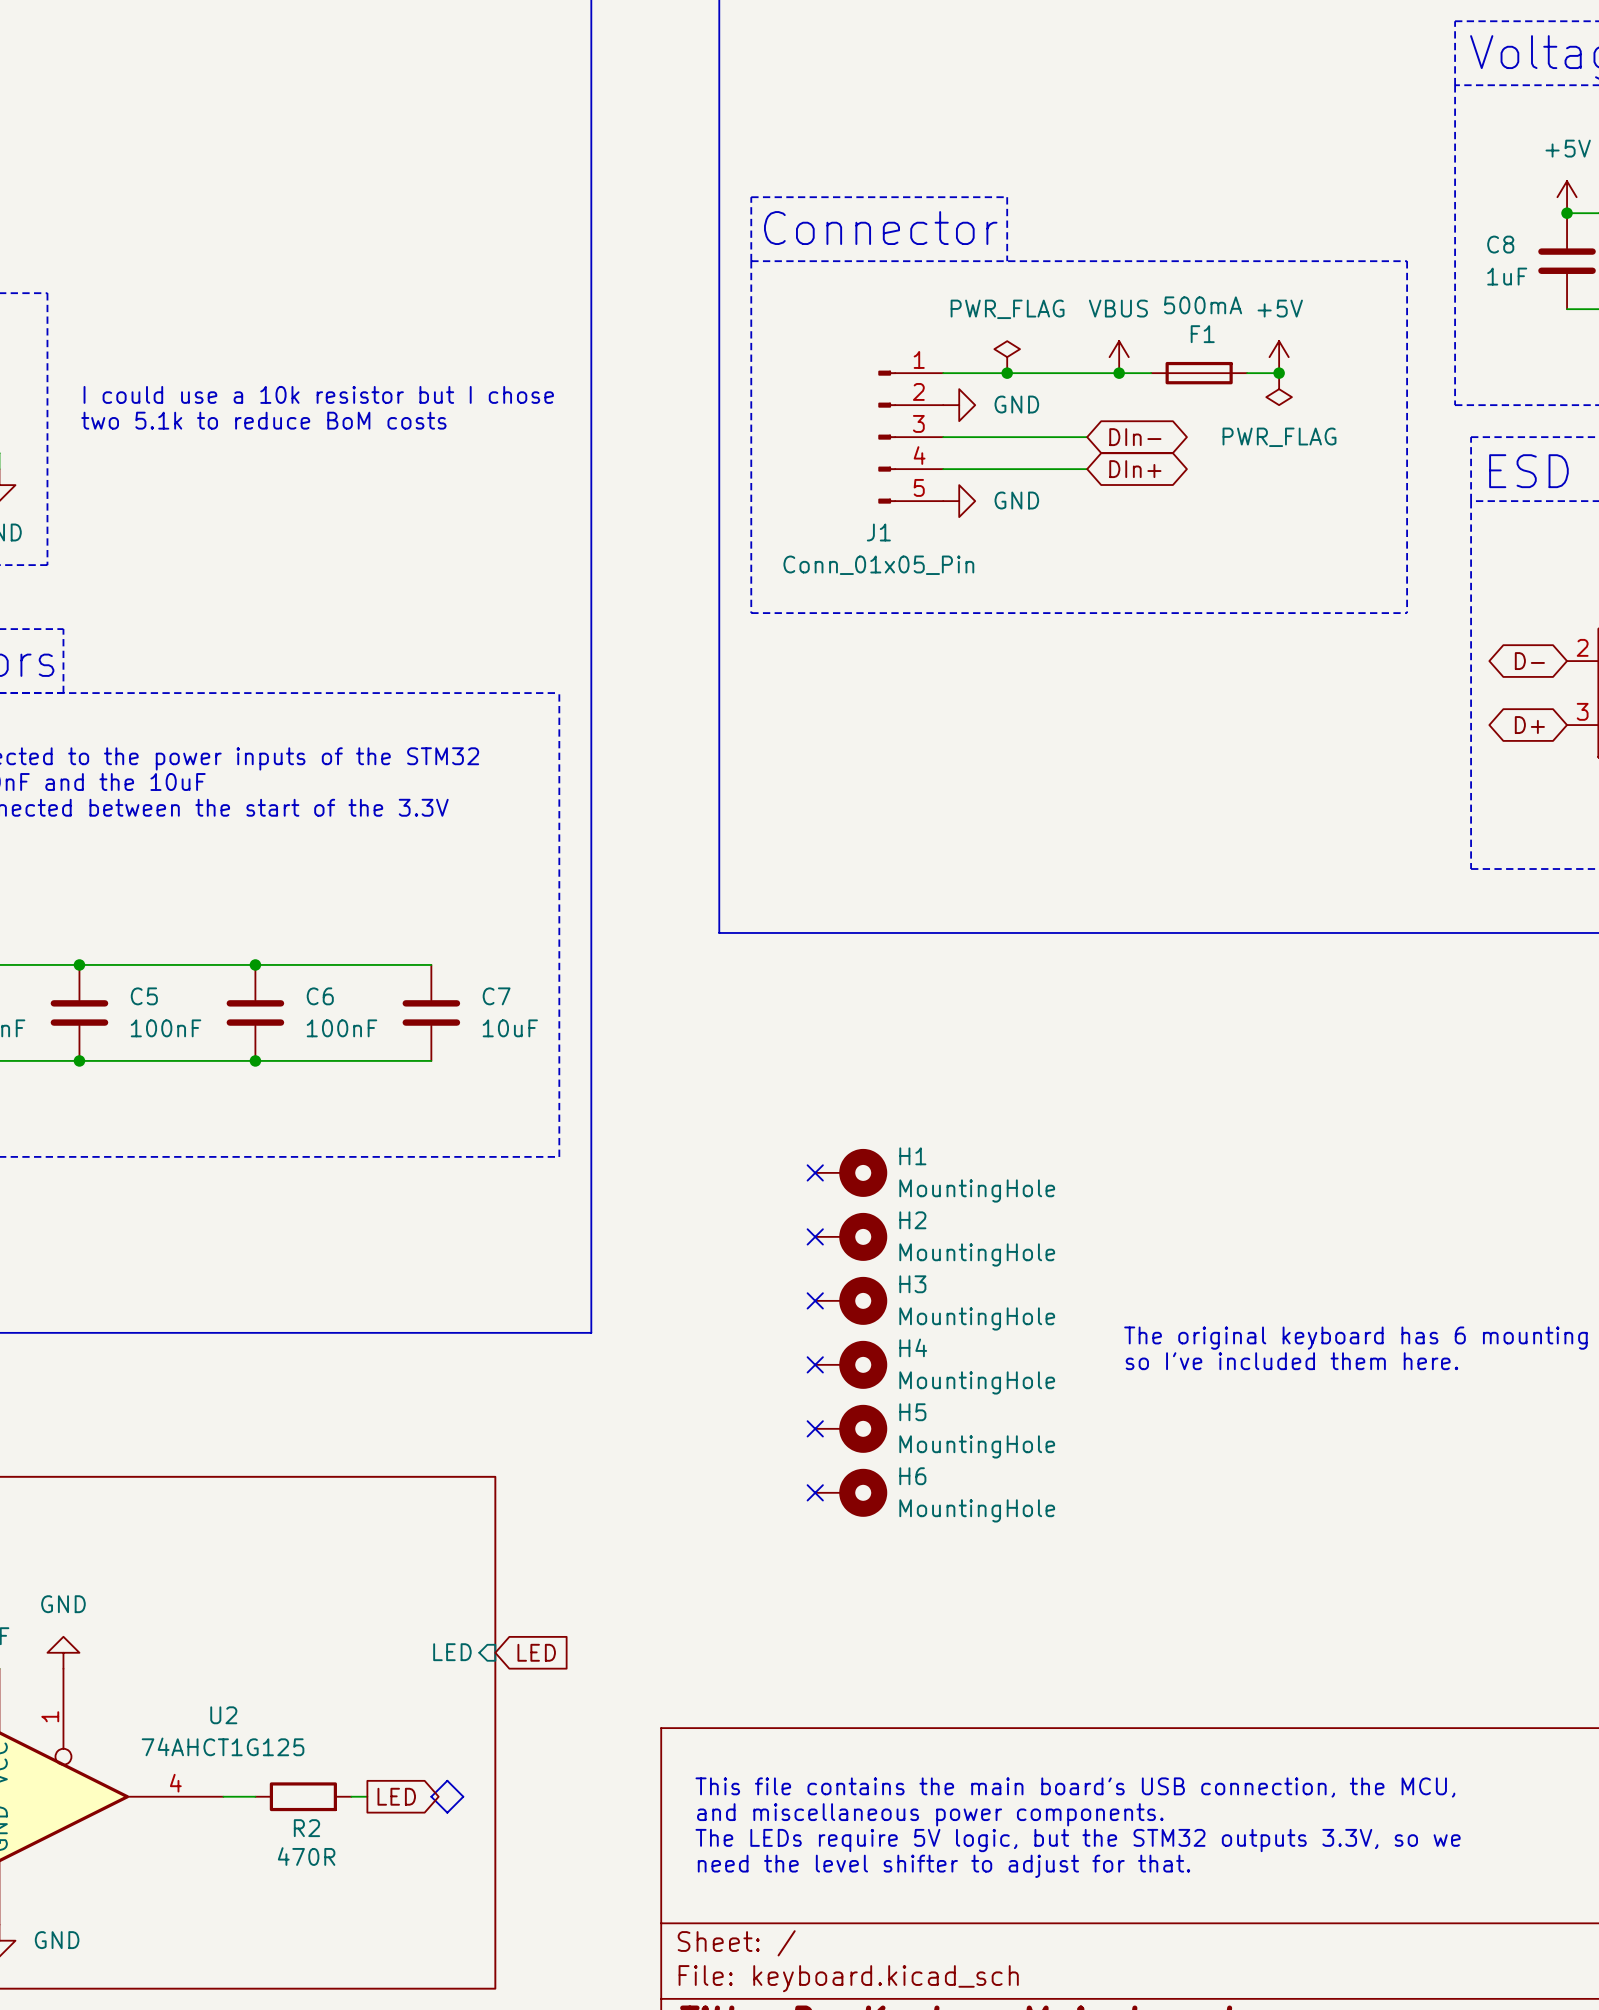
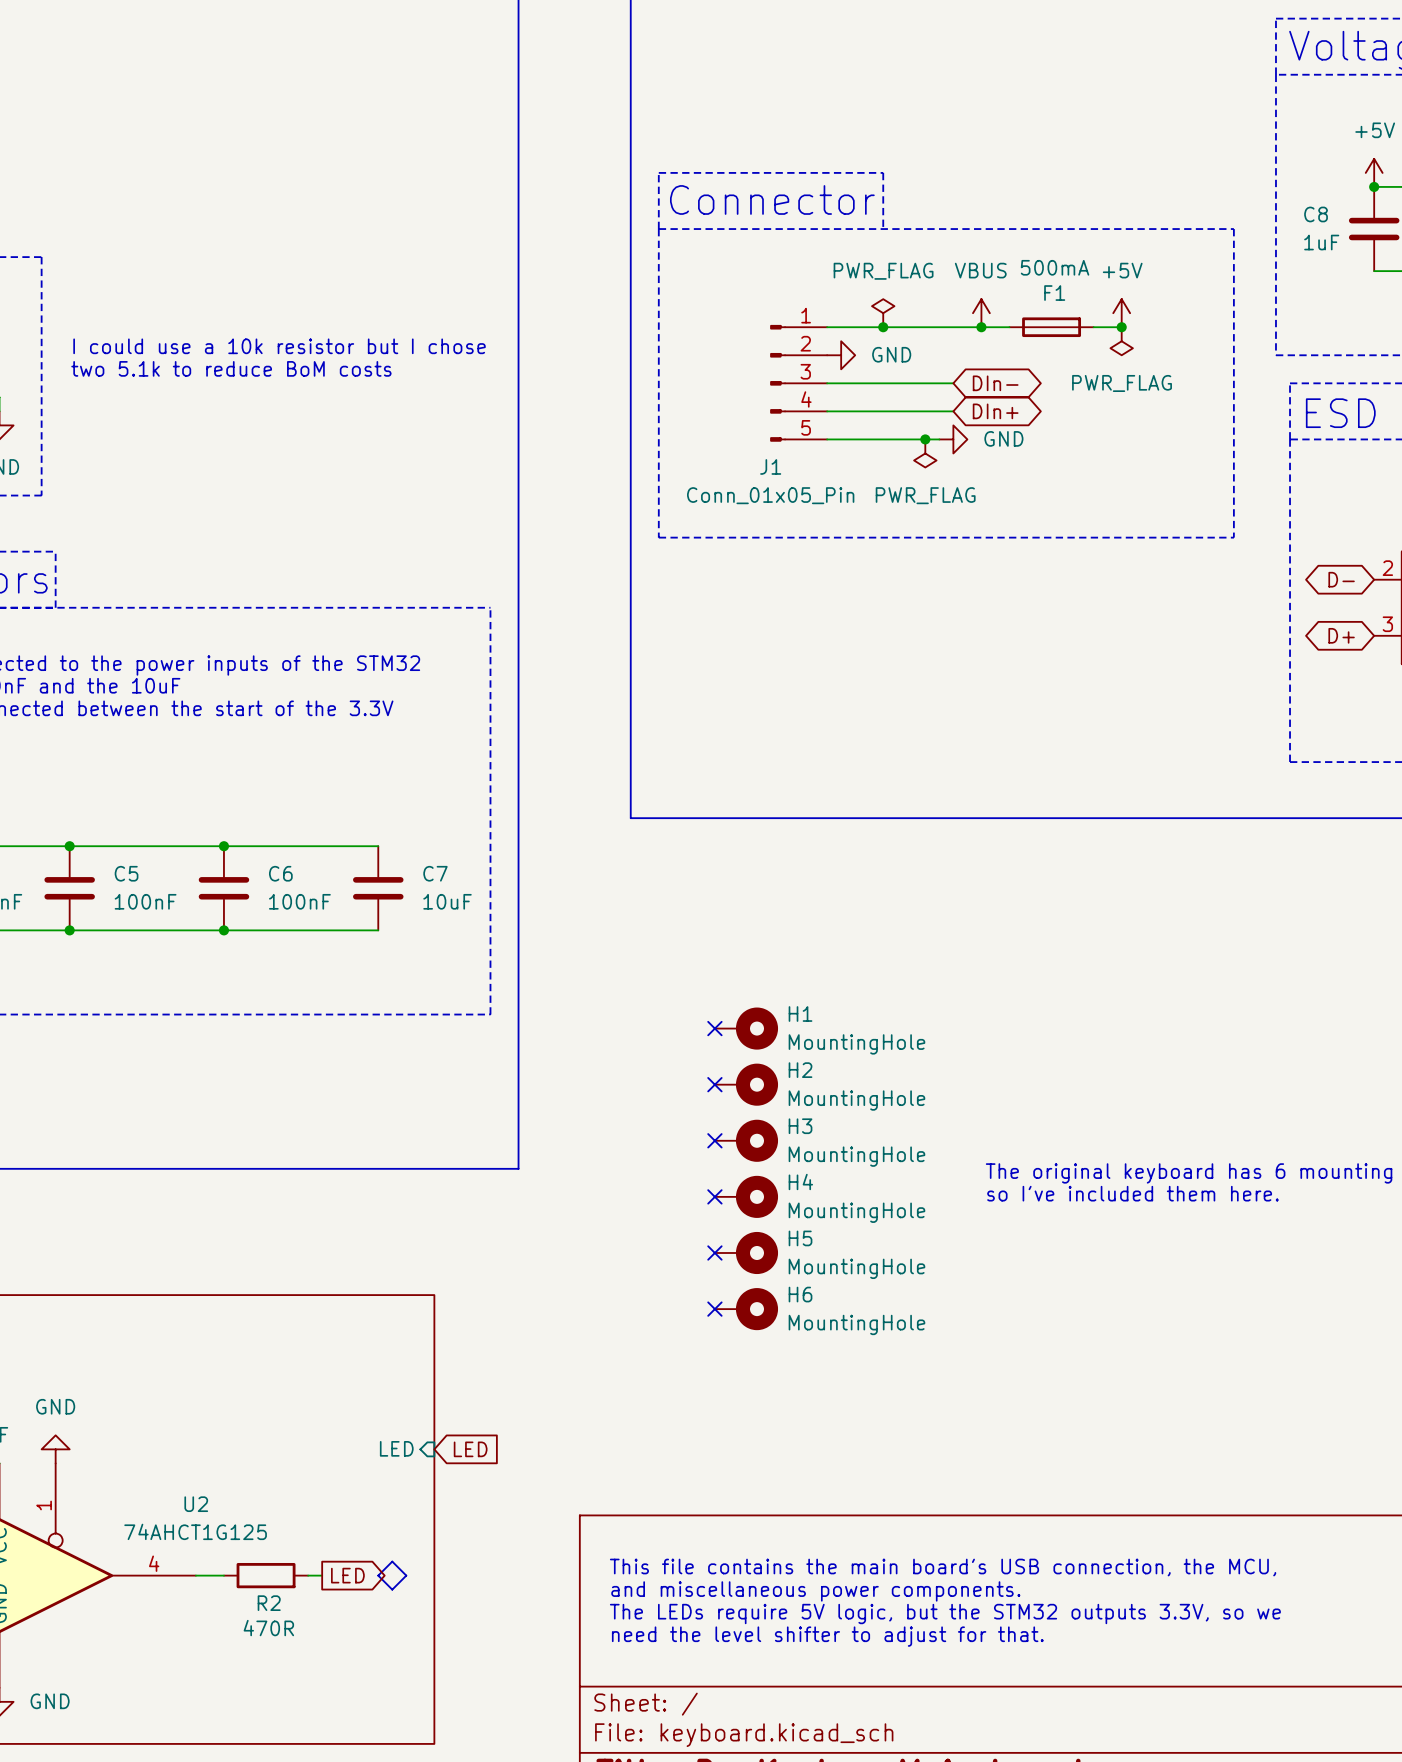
wire: none -> (827, 439) (939, 439)
power symbol position: GND (959, 501) -> GND (953, 439)
junction: none -> (925, 439)
power symbol: none -> PWR_FLAG (925, 453)

